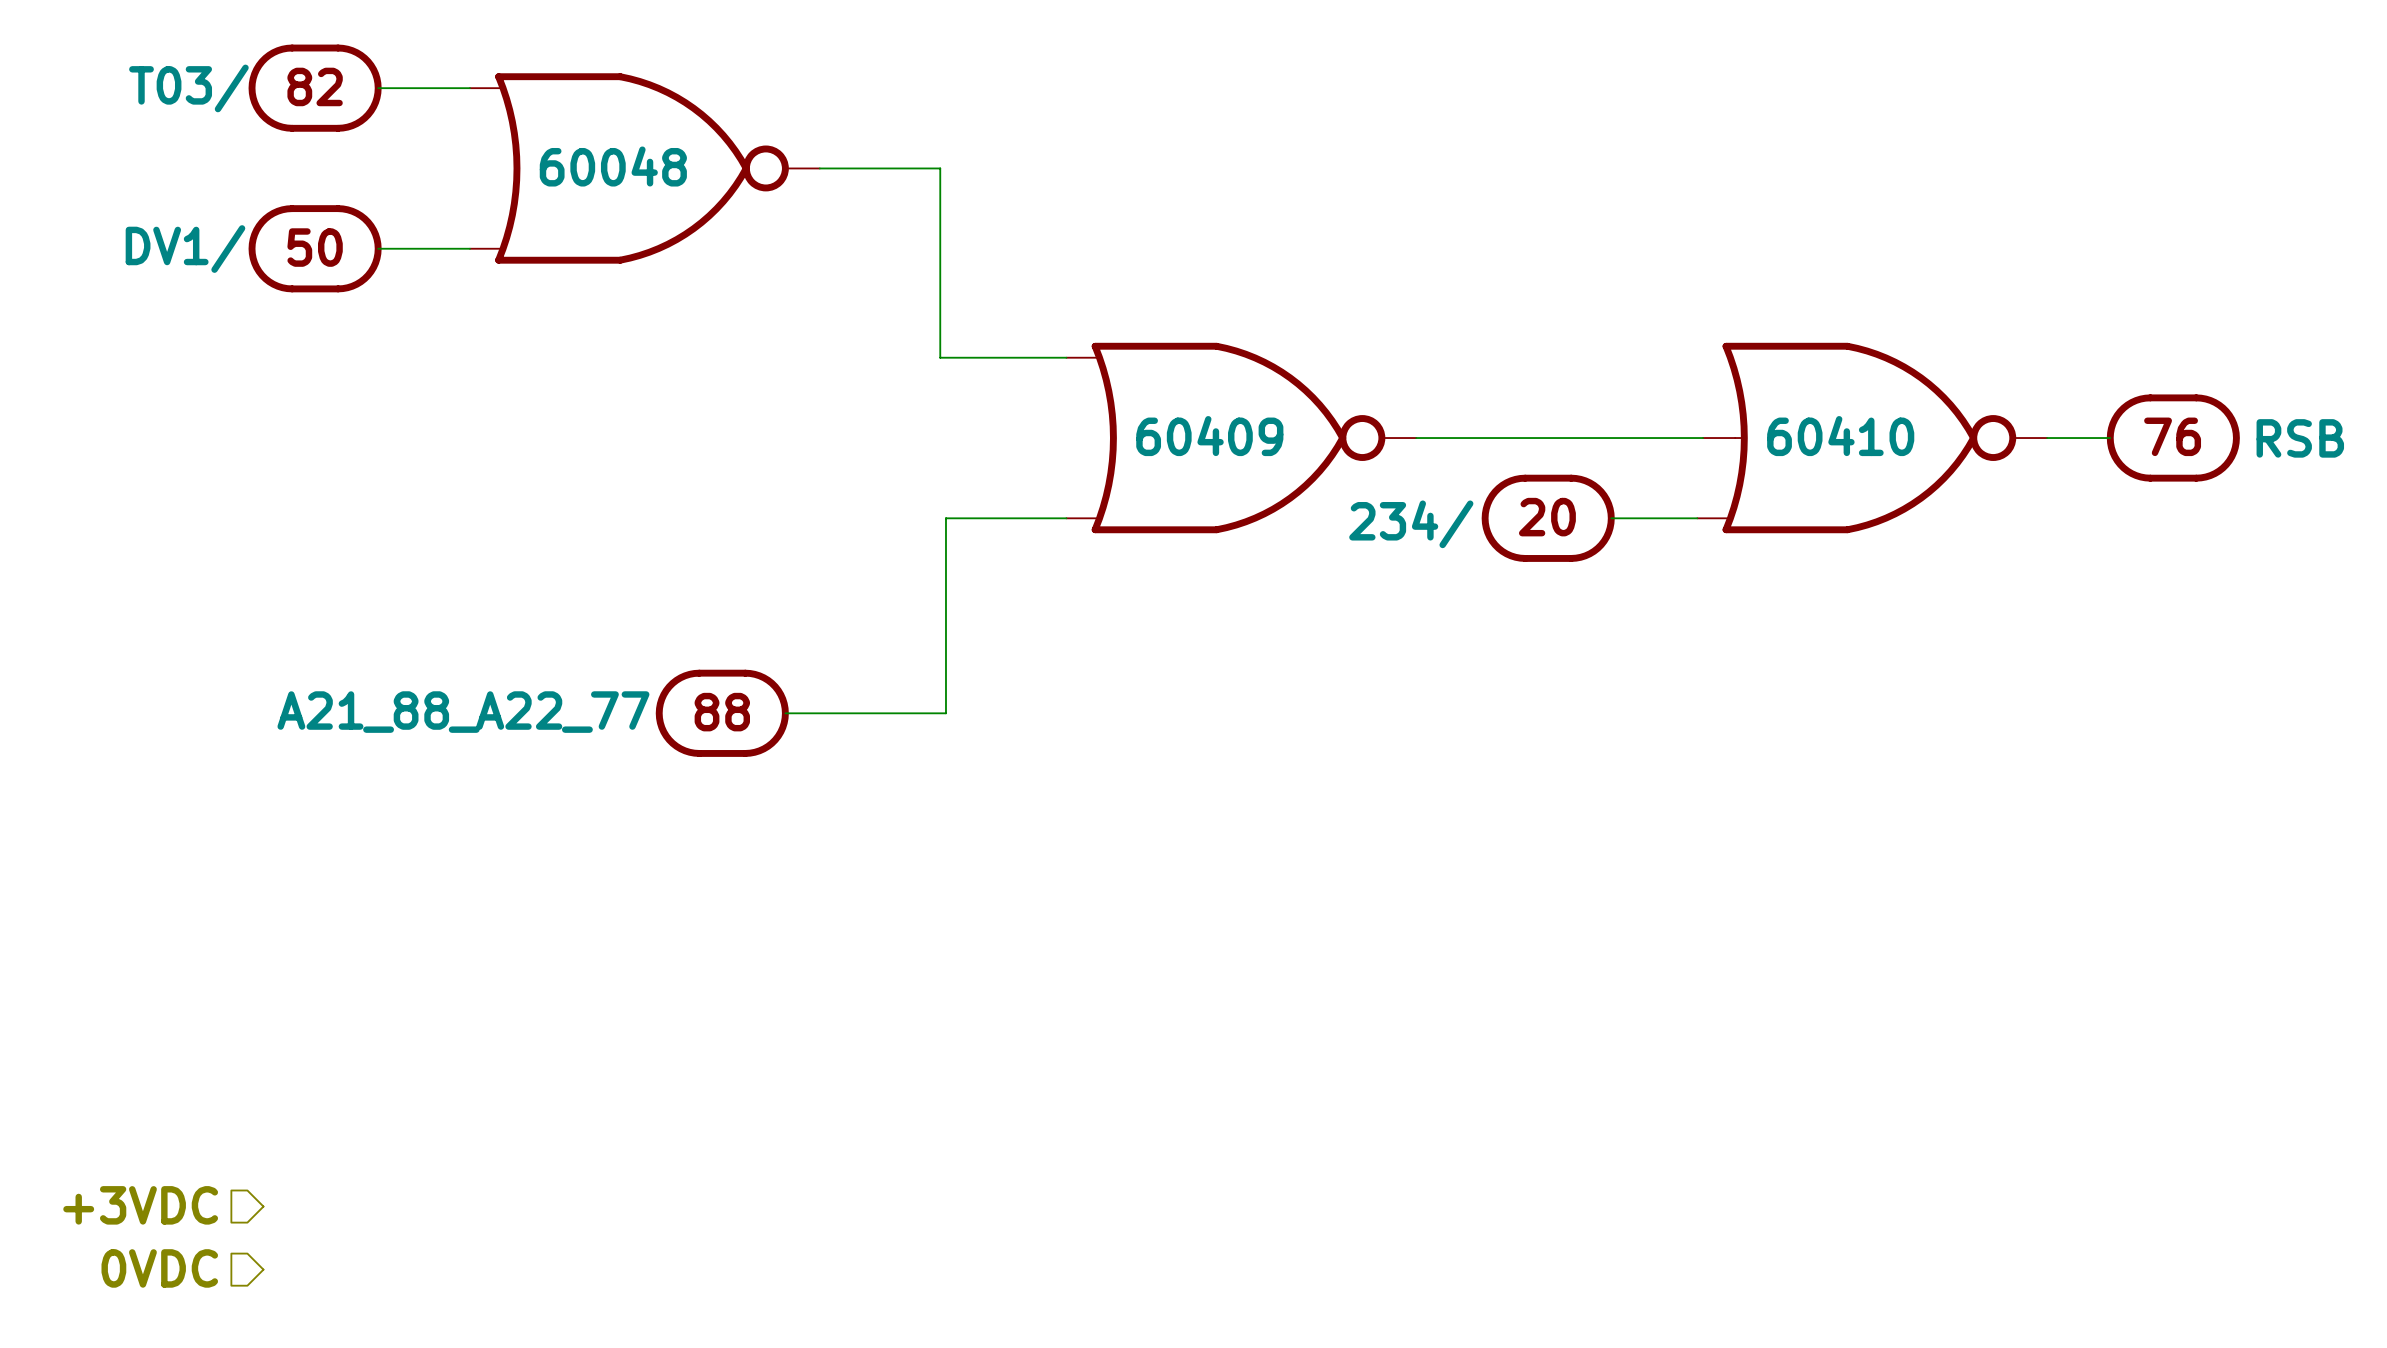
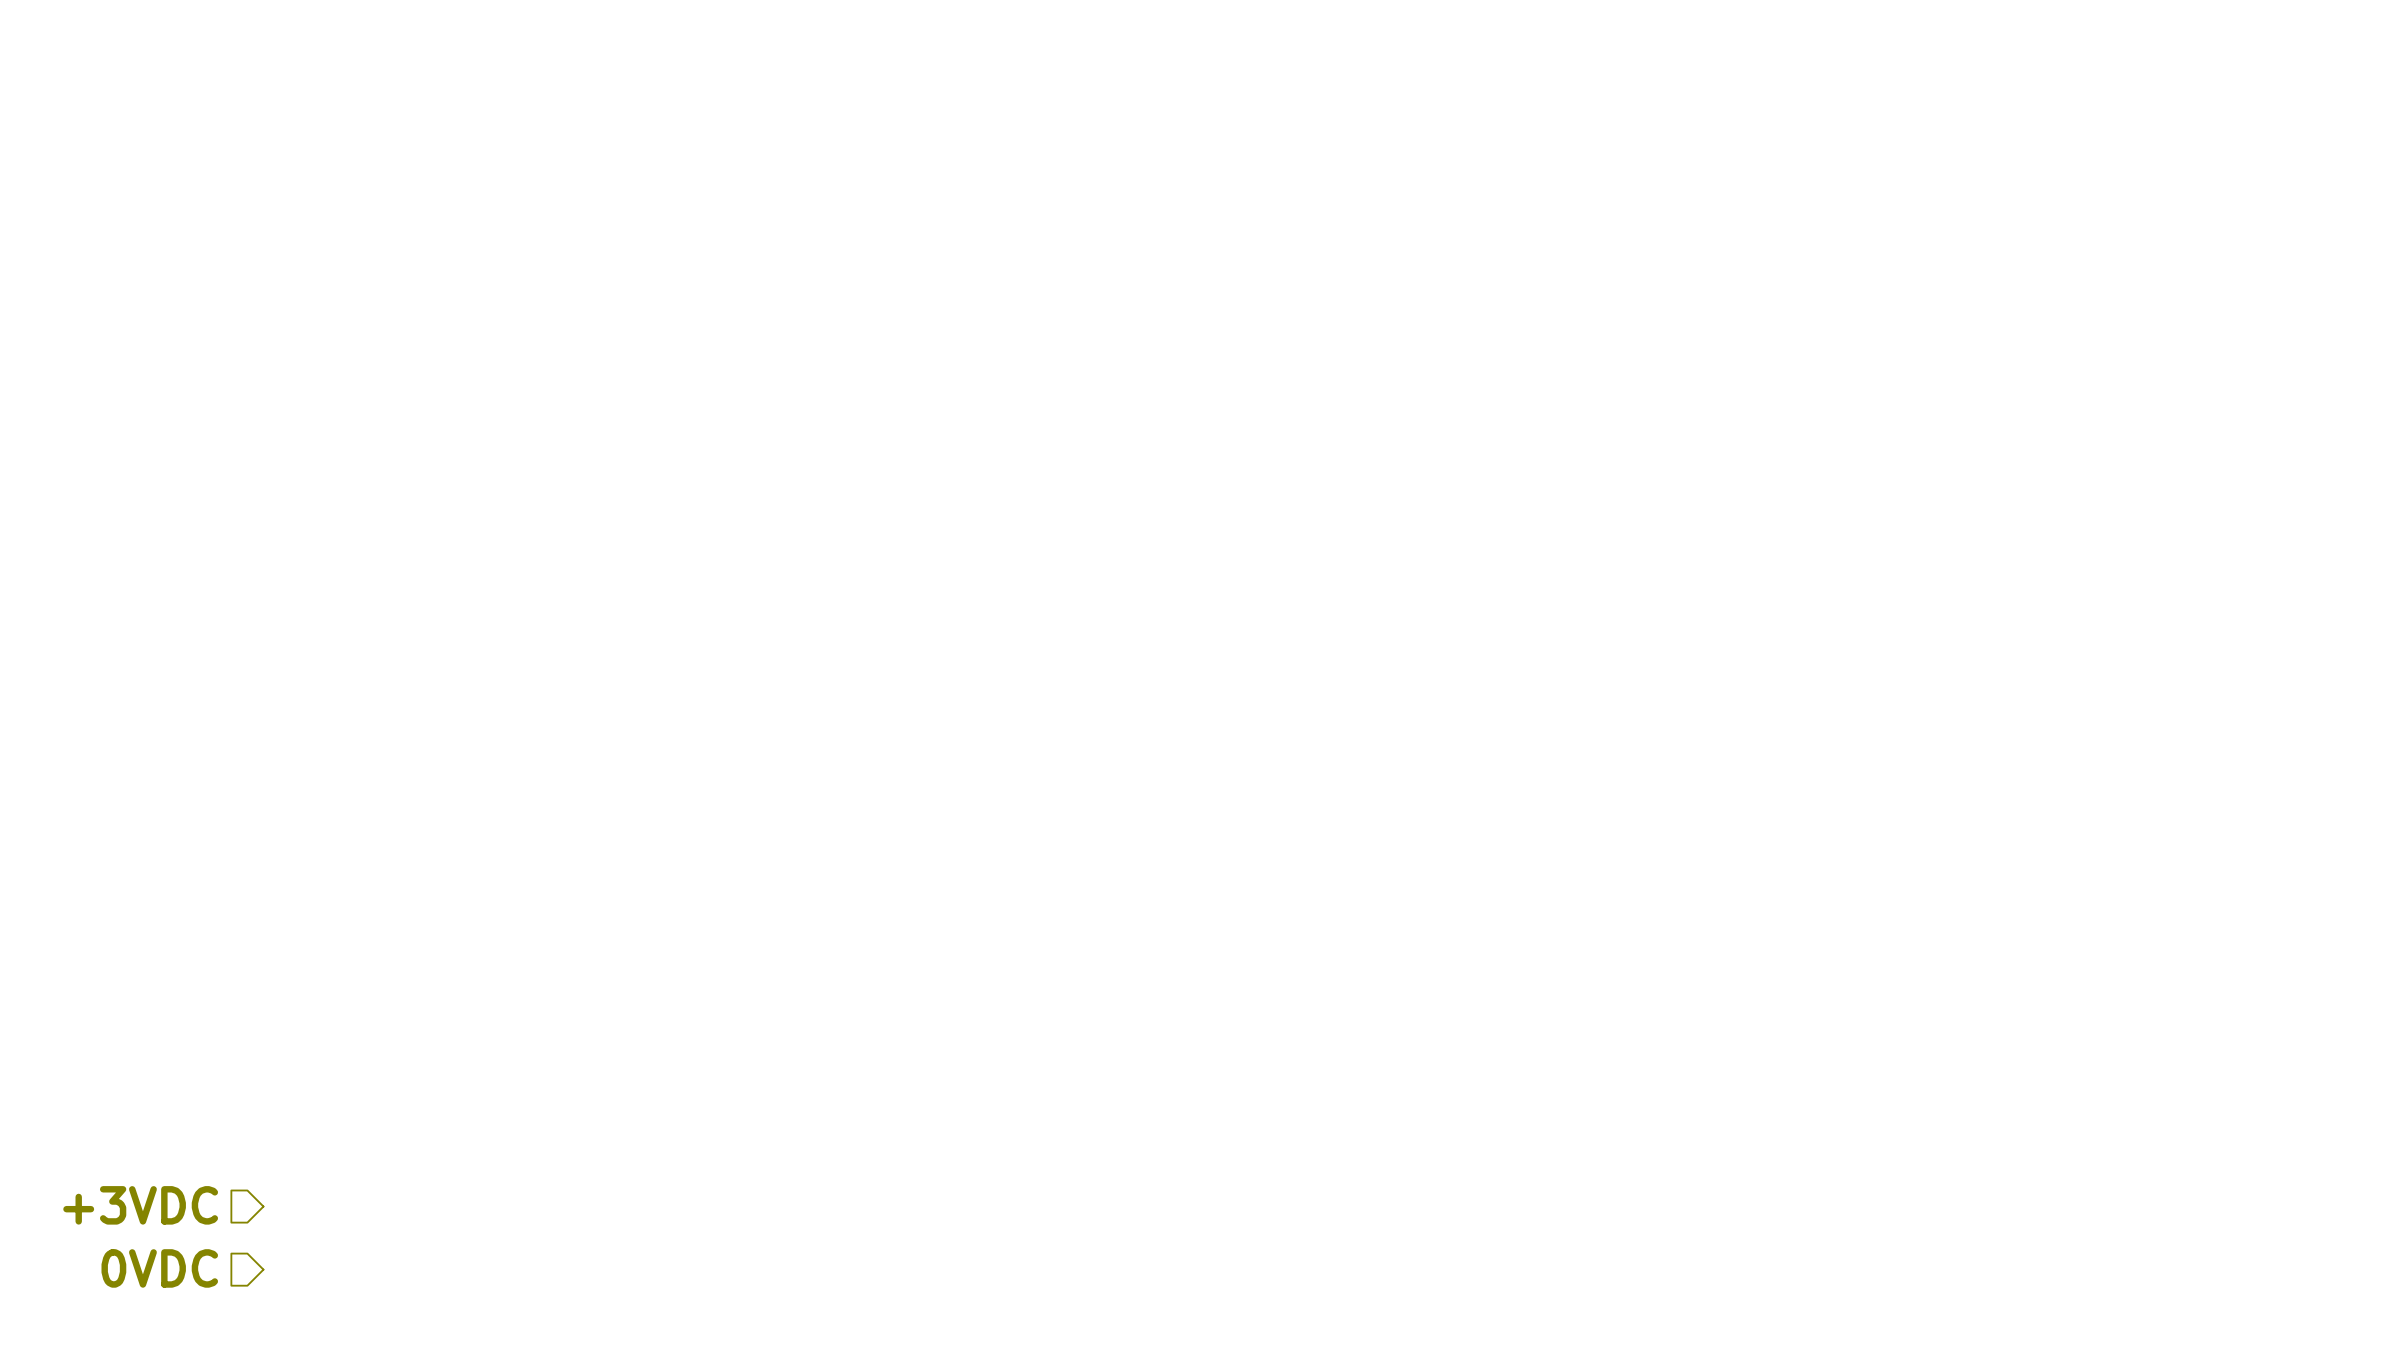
part: (315, 88) -> none
wire: (378, 88) (469, 88) -> none
part: (644, 168) -> none
wire: (819, 168) (940, 168) (940, 357) (1066, 357) -> none
part: (315, 248) -> none
wire: (378, 248) (469, 248) -> none
part: (1241, 438) -> none
wire: (1416, 438) (1703, 438) -> none
part: (1872, 438) -> none
wire: (2047, 438) (2110, 438) -> none
part: (2173, 438) -> none
wire: (1066, 518) (945, 518) (945, 713) (785, 713) -> none
part: (1548, 518) -> none
wire: (1611, 518) (1697, 518) -> none
part: (722, 713) -> none

